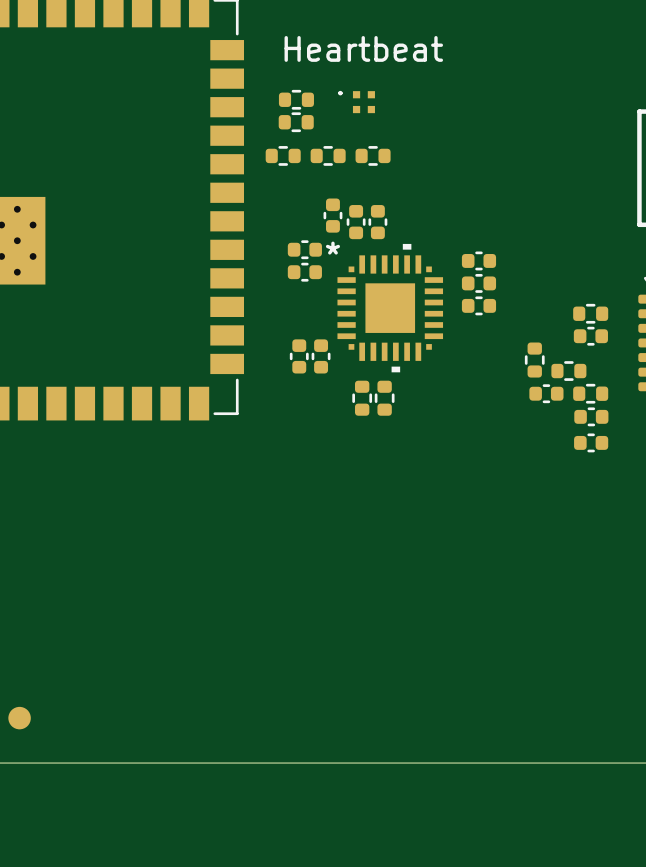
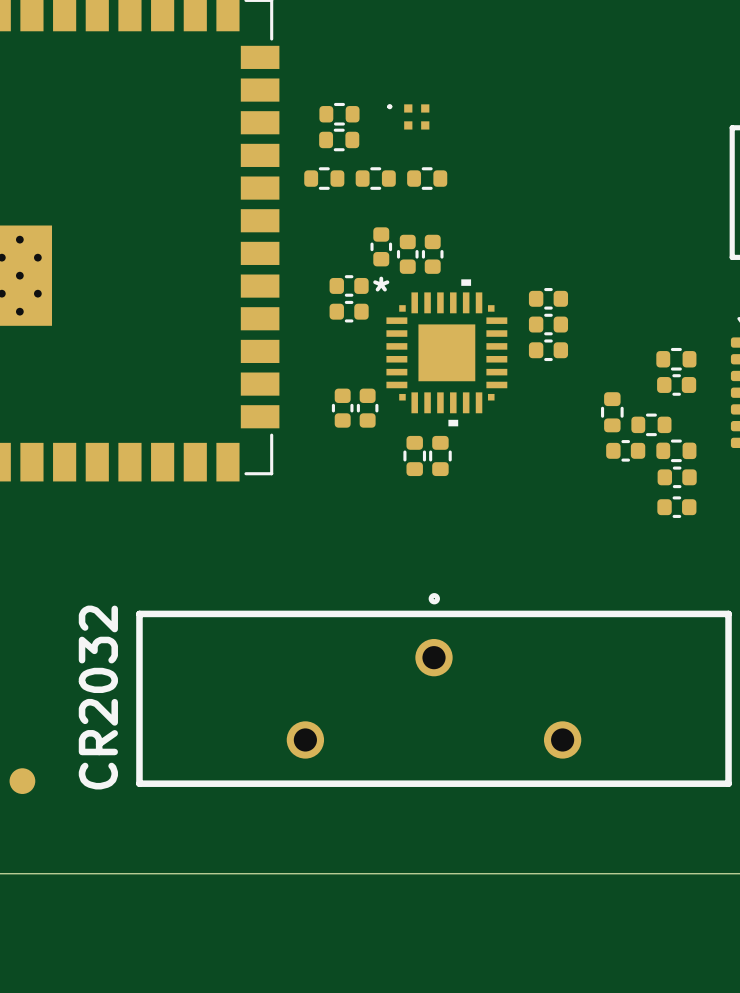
part text: Heartbeat (363, 48) -> none
part: none -> CR2032 (434, 690)
part position: (19, 718) -> (22, 781)

